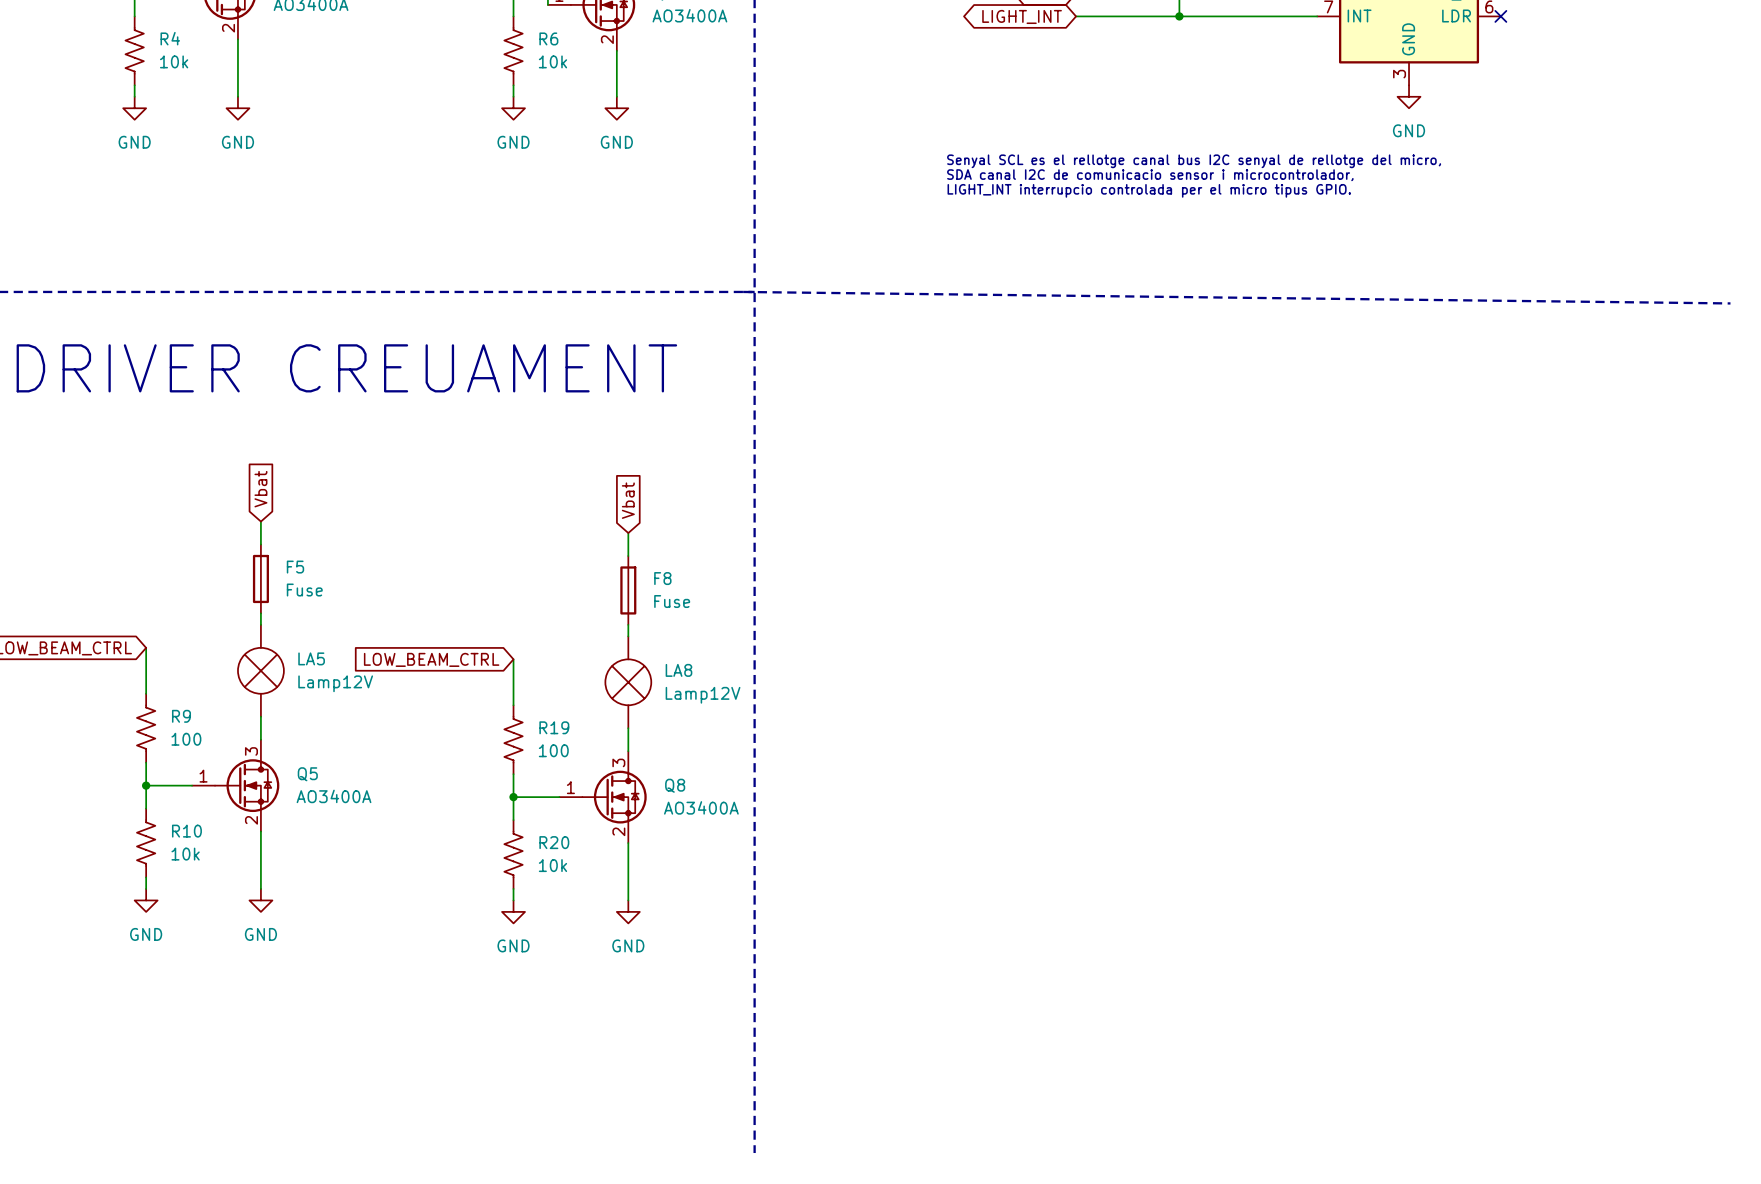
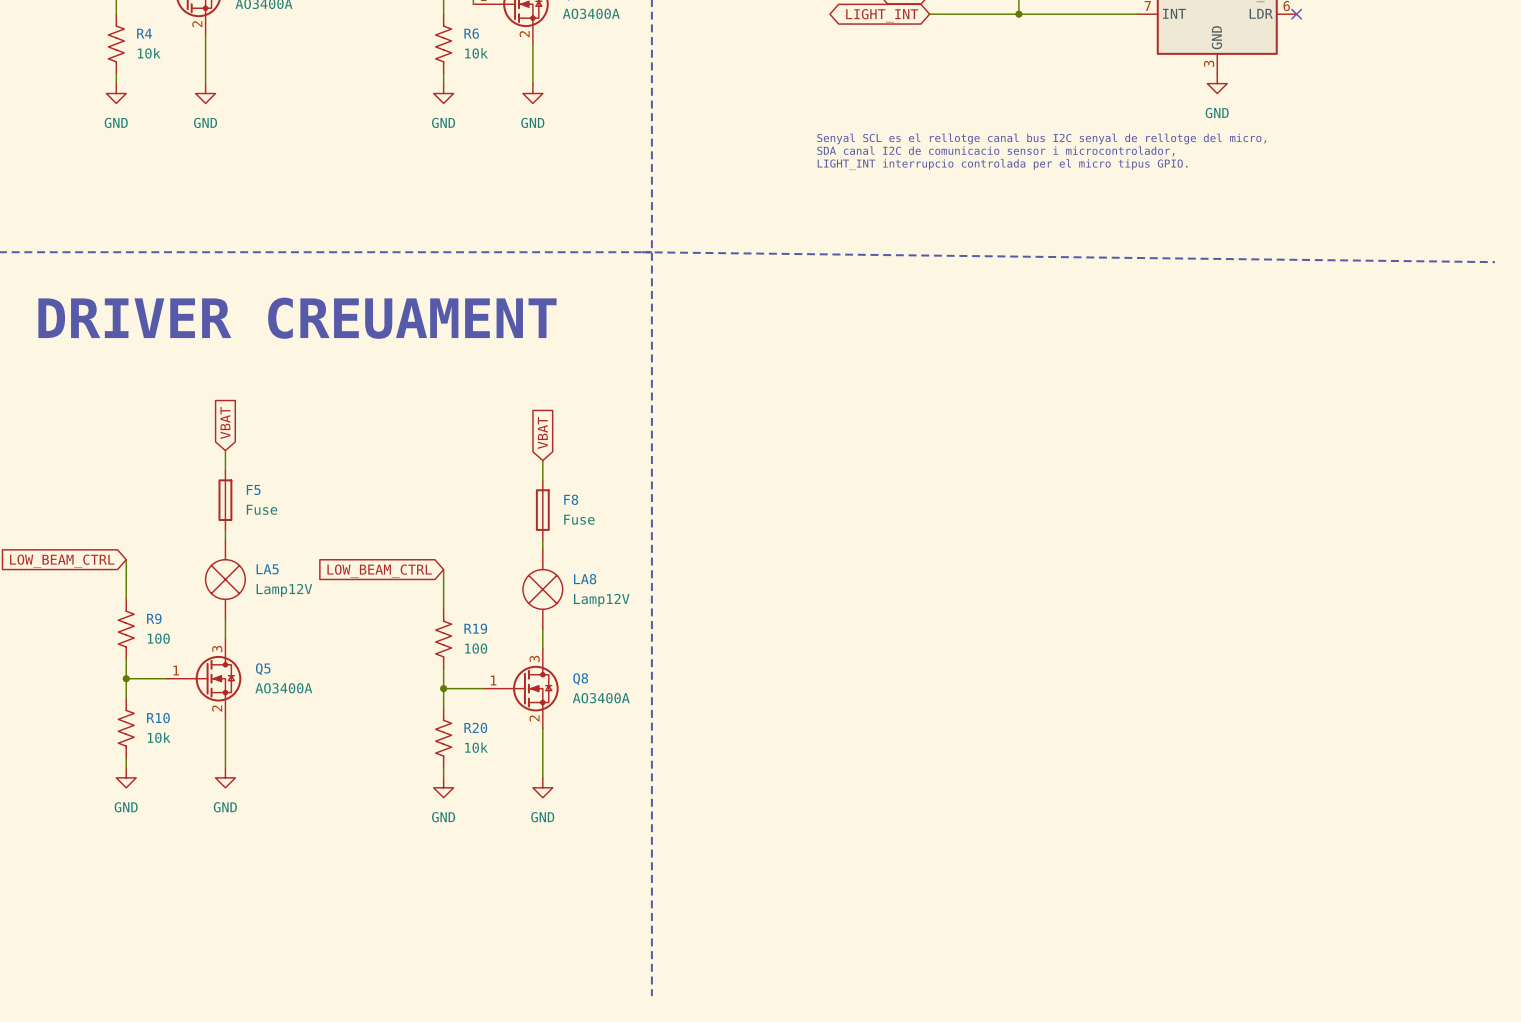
global label: Vbat (260, 489) -> VBAT (225, 423)
global label: Vbat (628, 500) -> VBAT (542, 432)

